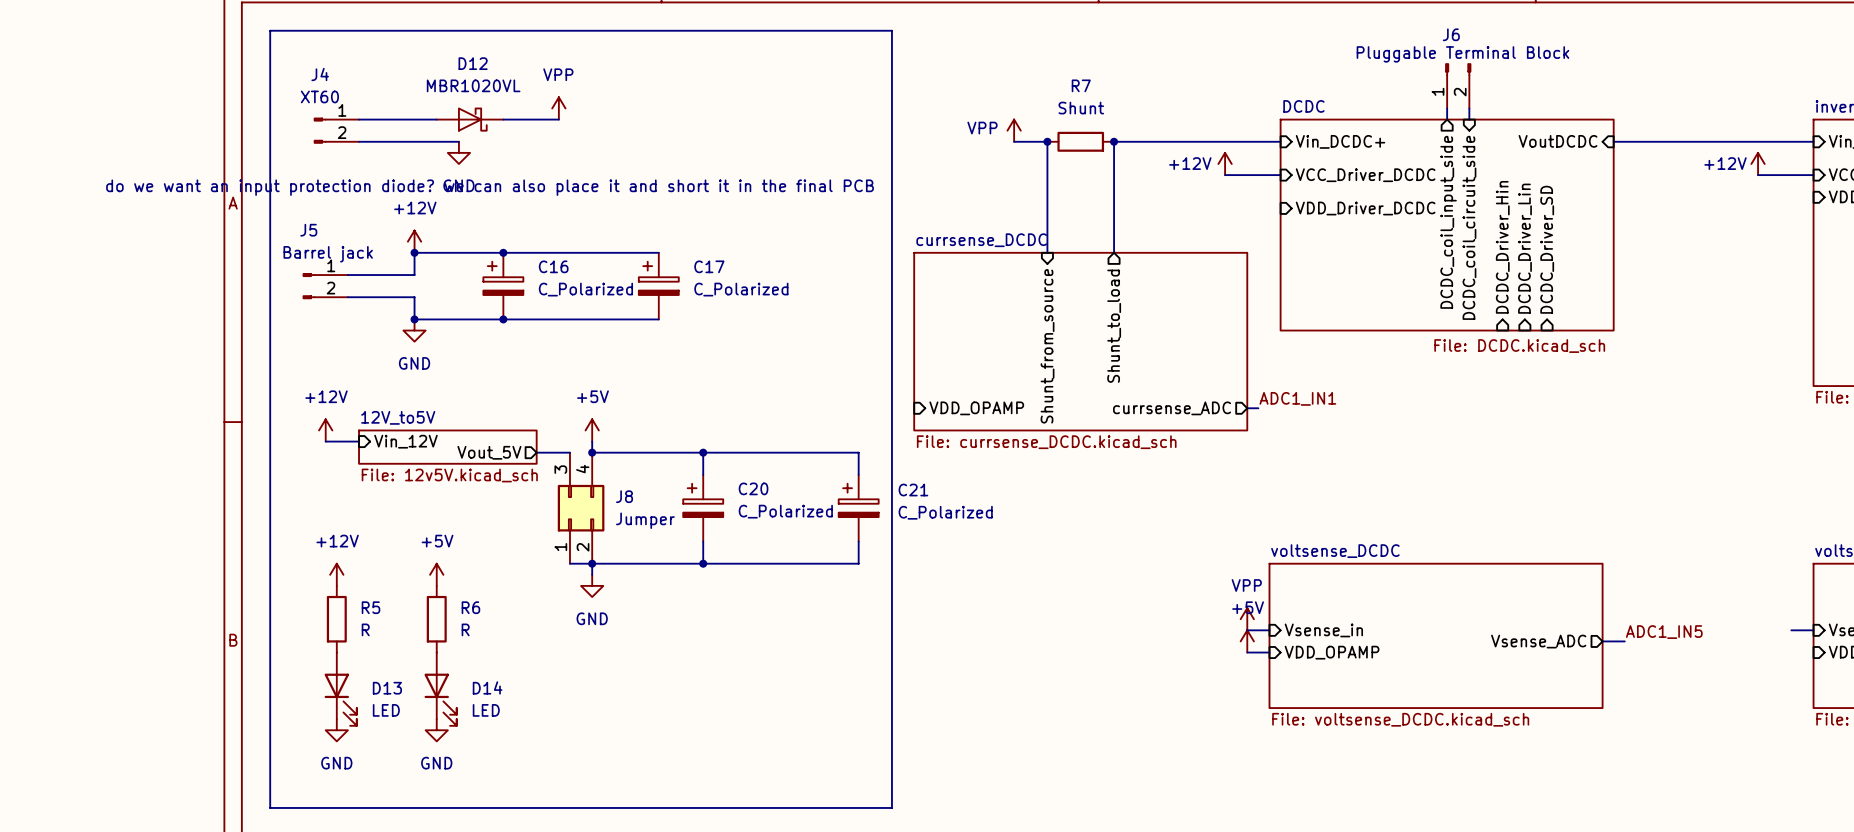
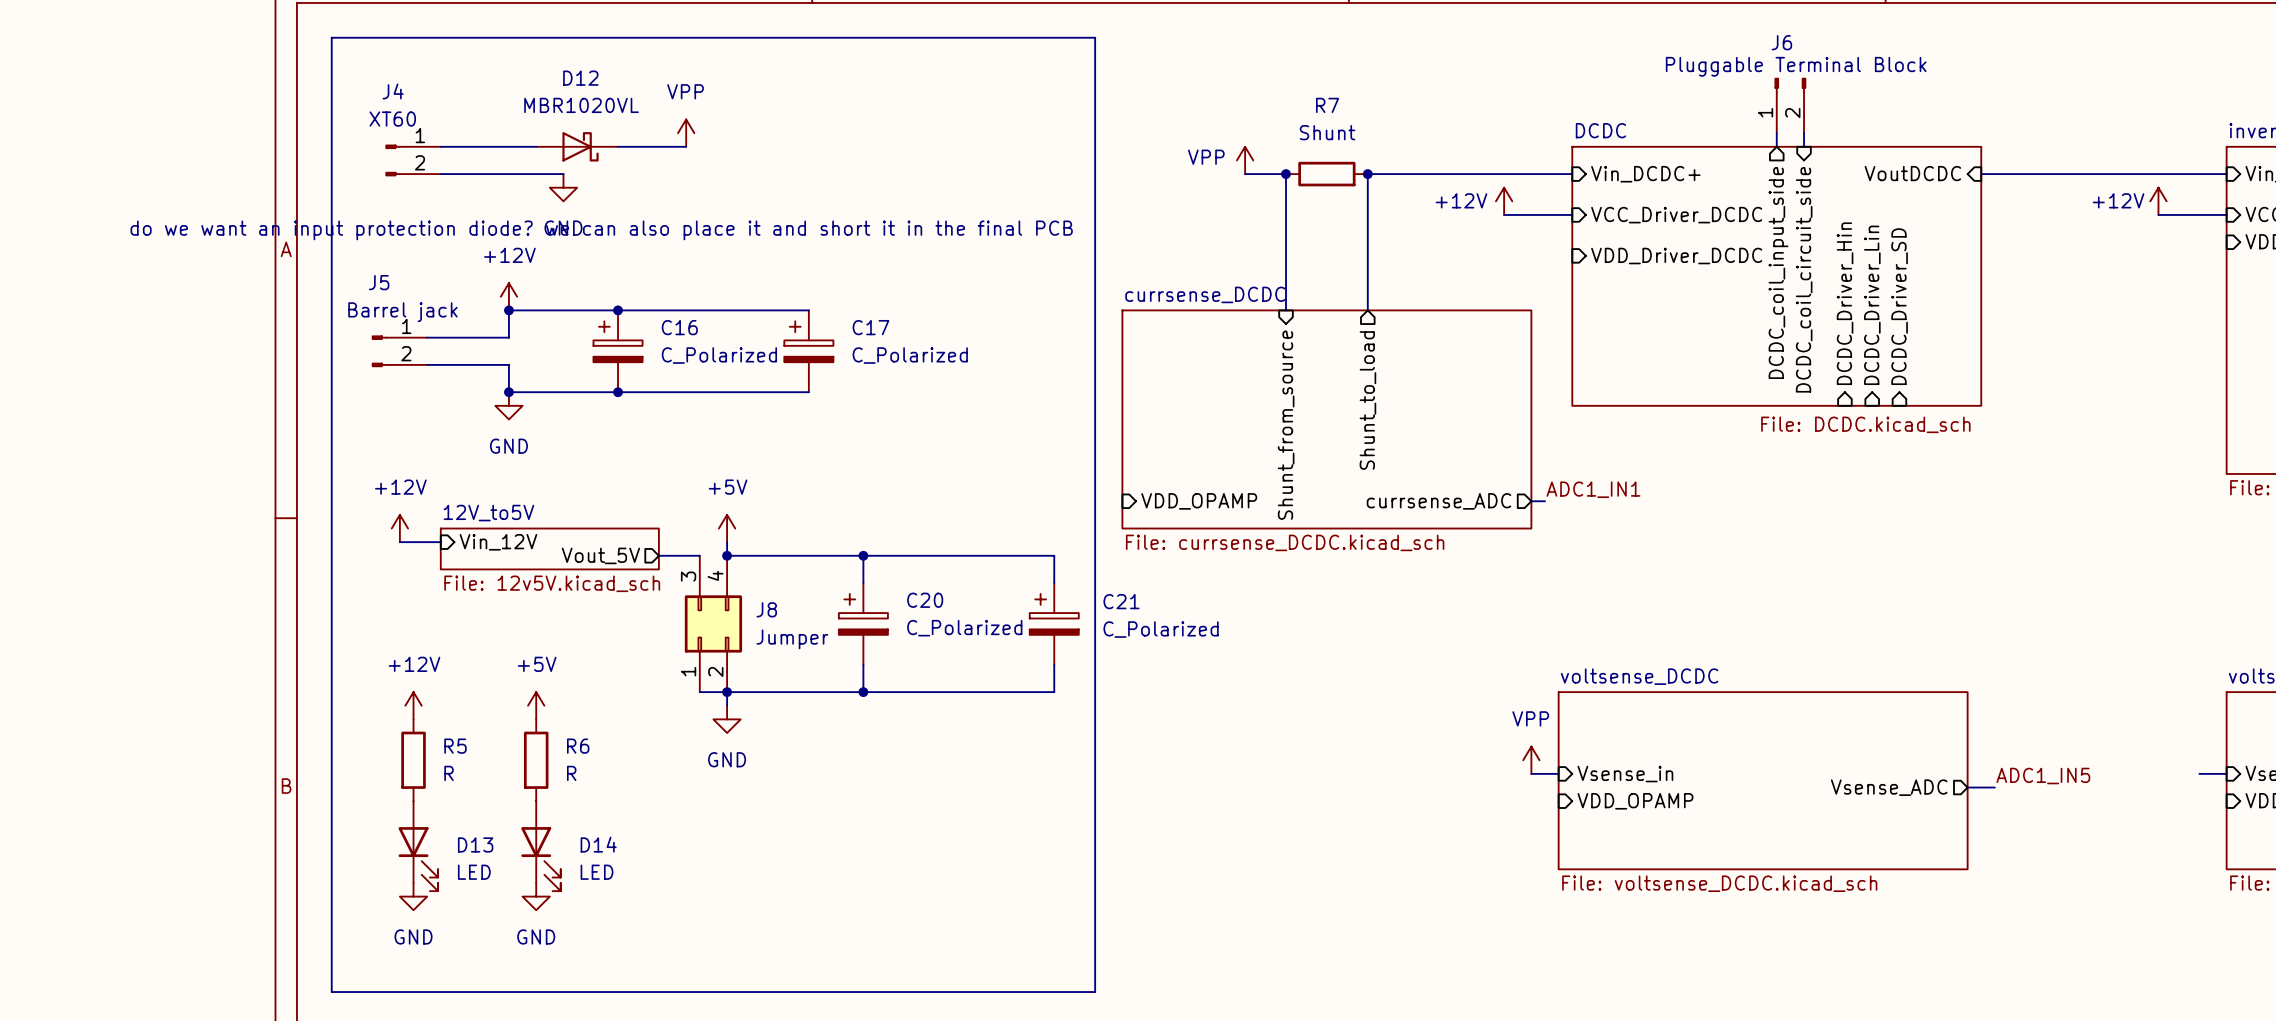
power symbol: +5V (1247, 641) -> none
wire: (1247, 652) (1269, 652) -> none

